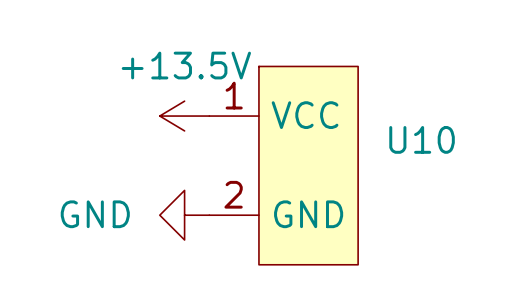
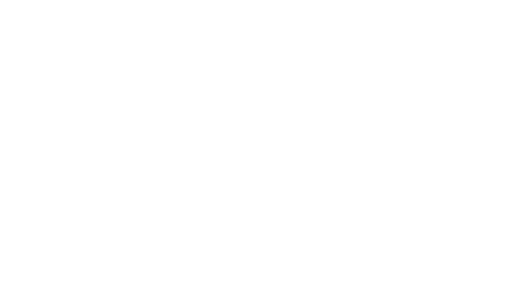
power symbol: +13.5V (184, 116) -> none
U10: (283, 165) -> none
power symbol: GND (184, 215) -> none

